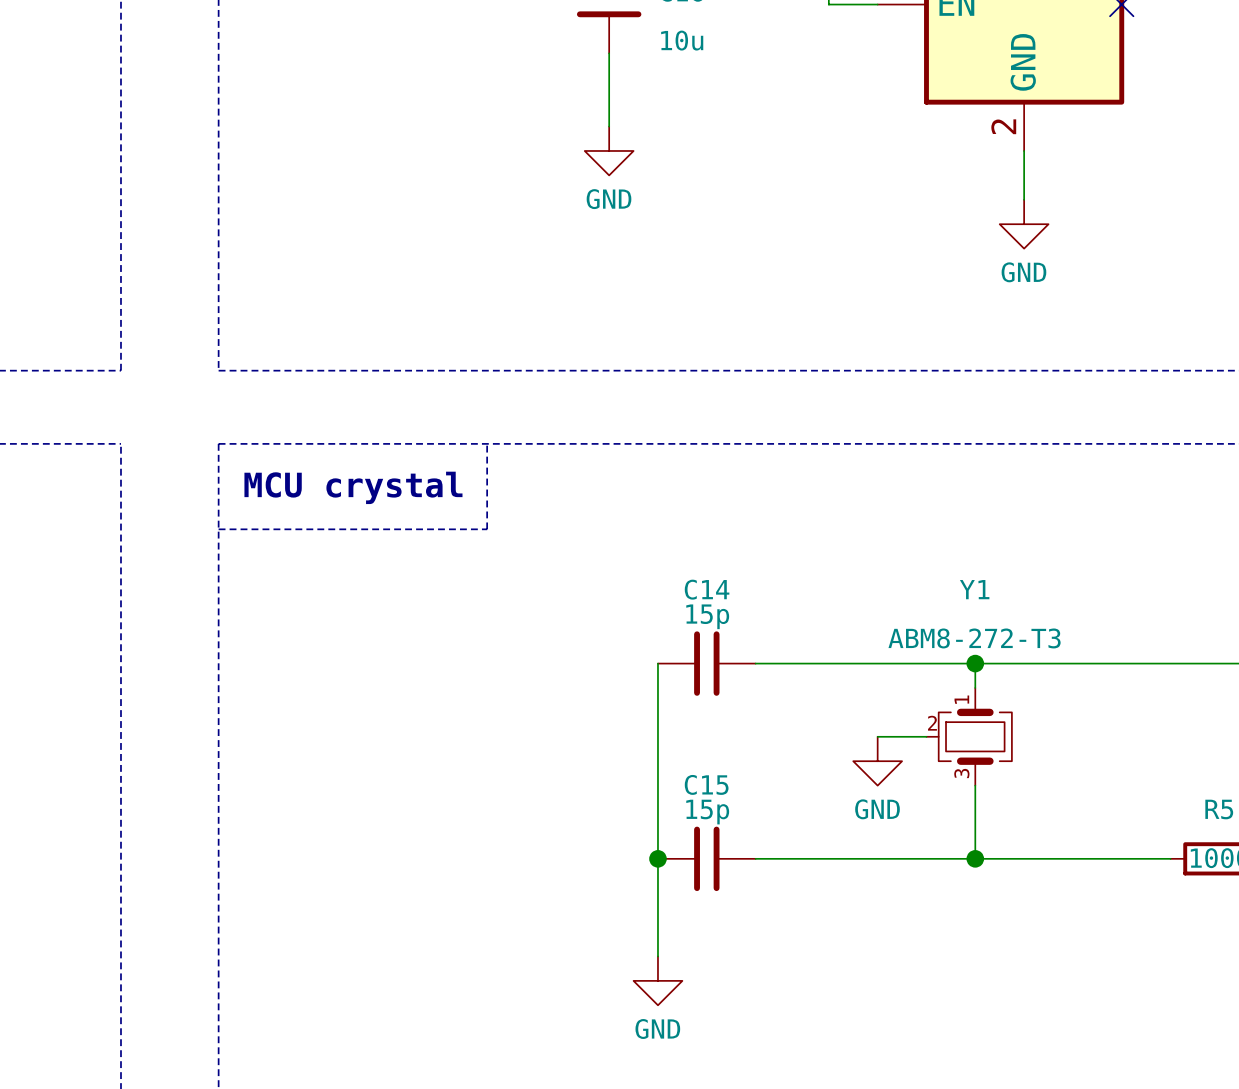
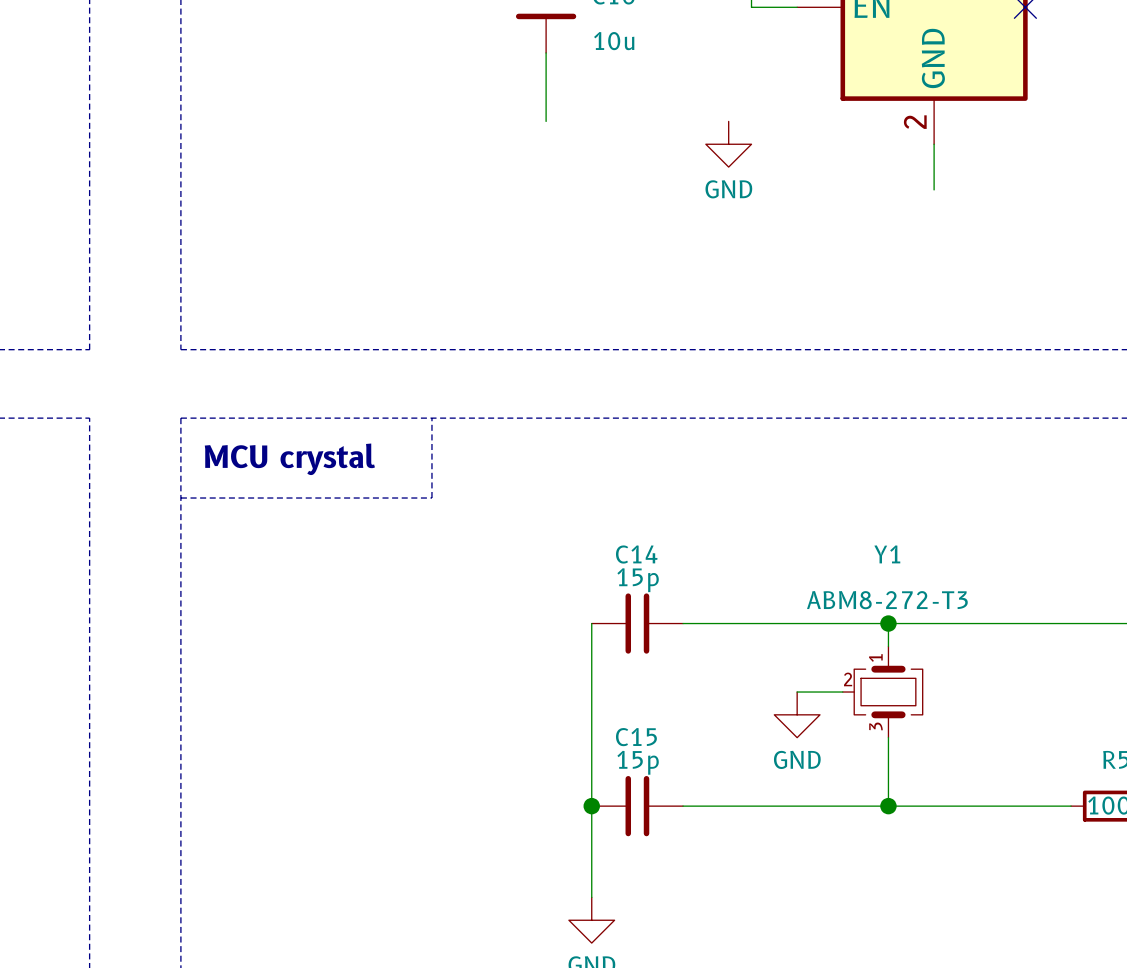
power symbol: GND (609, 150) -> none
power symbol: none -> GND (728, 144)
power symbol: GND (1024, 224) -> none

